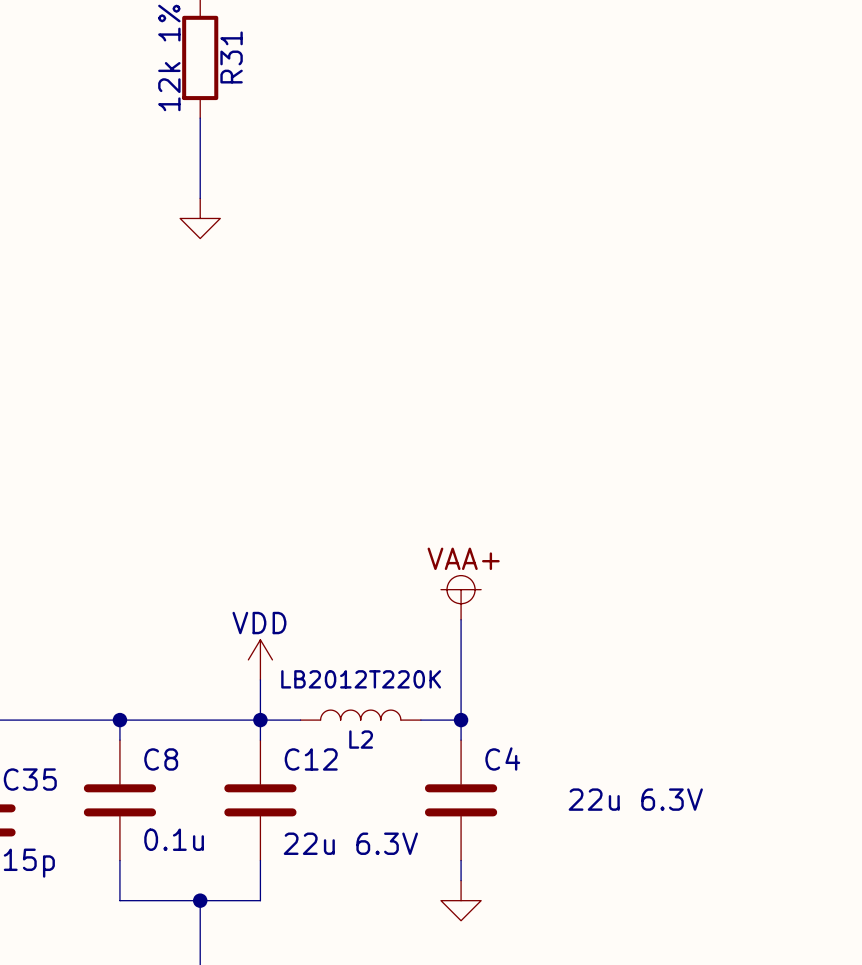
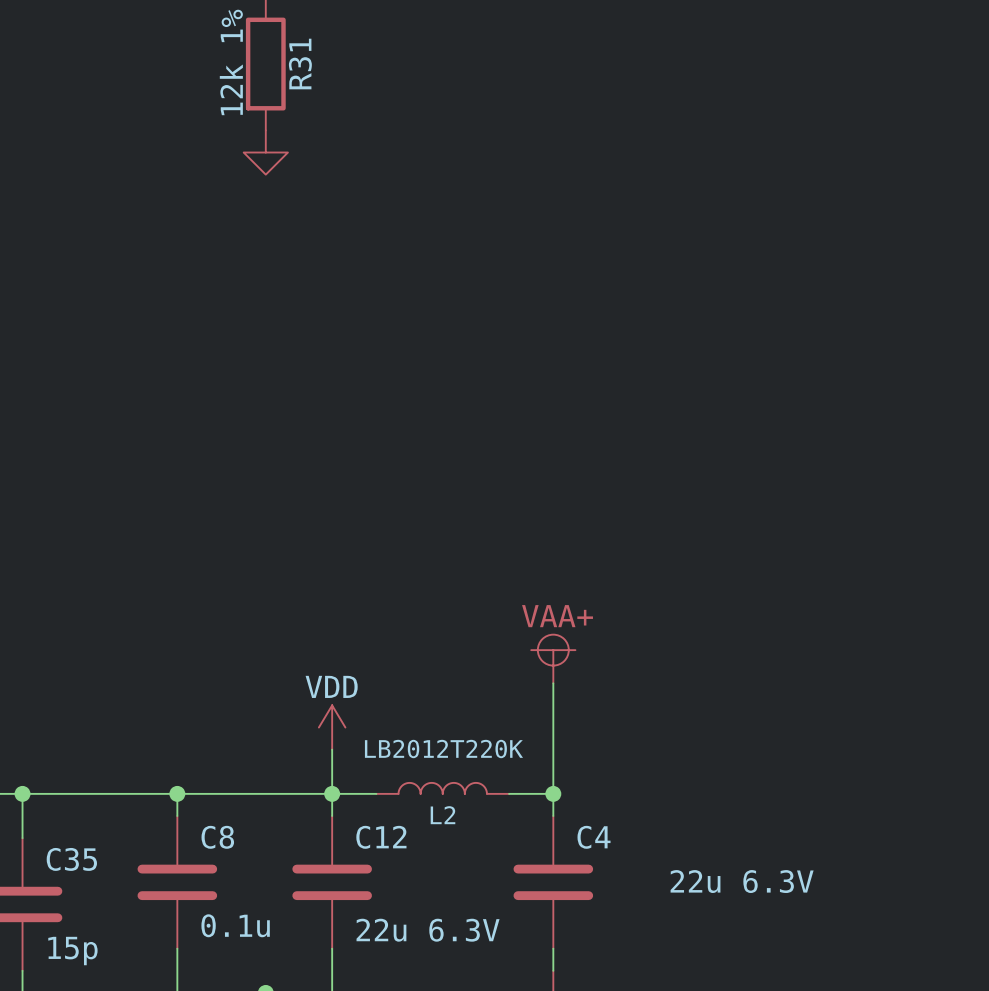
wire: (200, 118) (200, 198) -> none
power symbol position: (200, 218) -> (265, 152)

